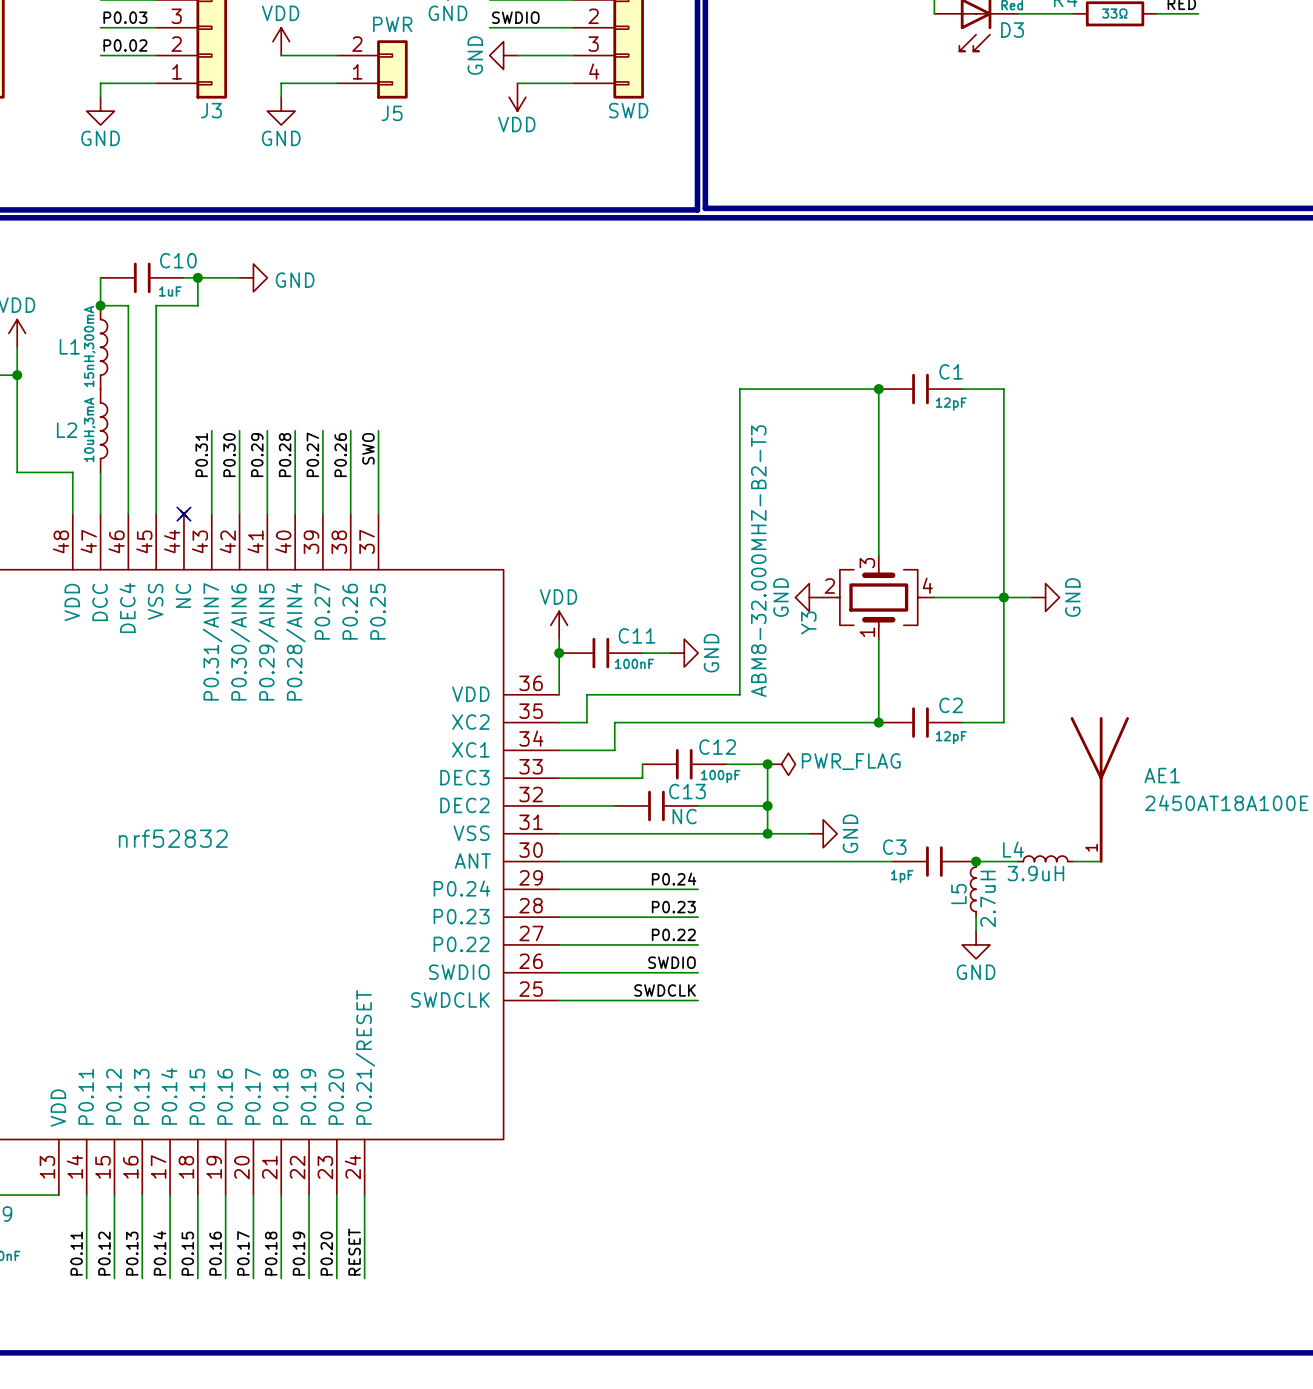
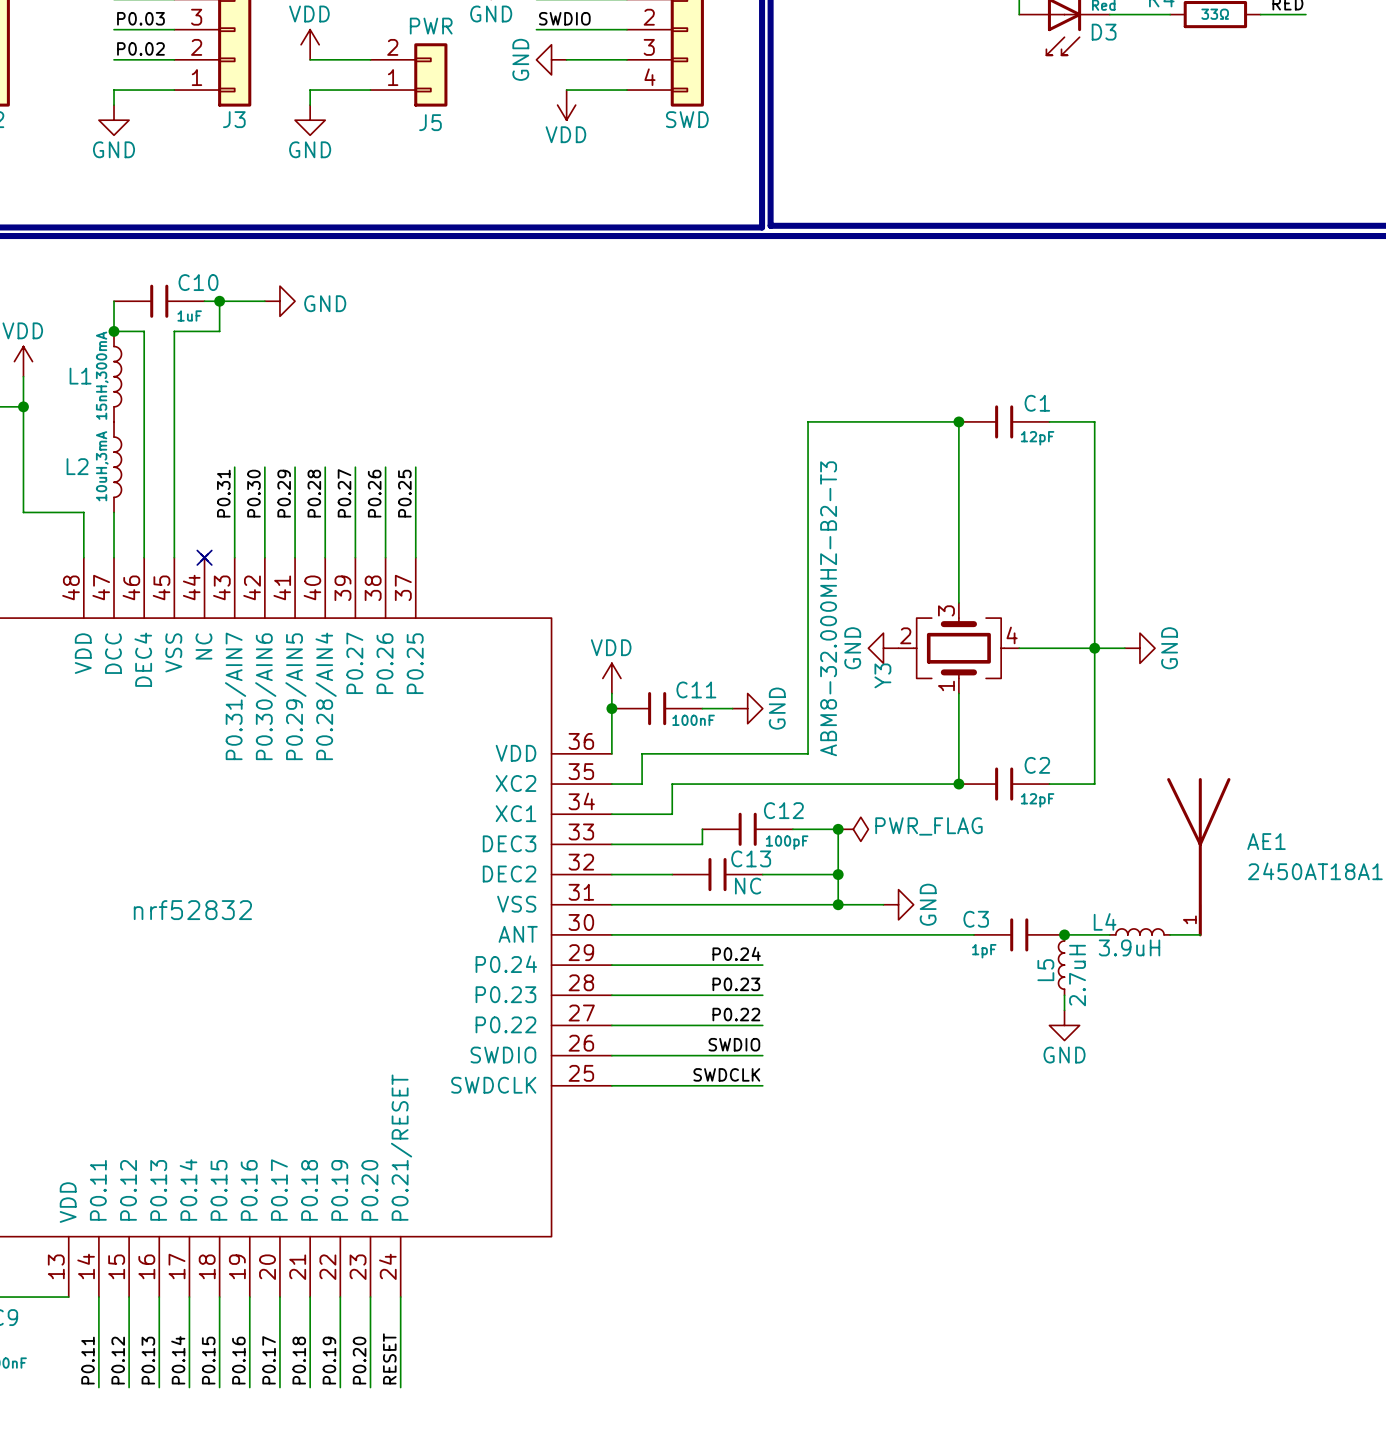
label: SWO (368, 448) -> P0.25 (404, 493)

